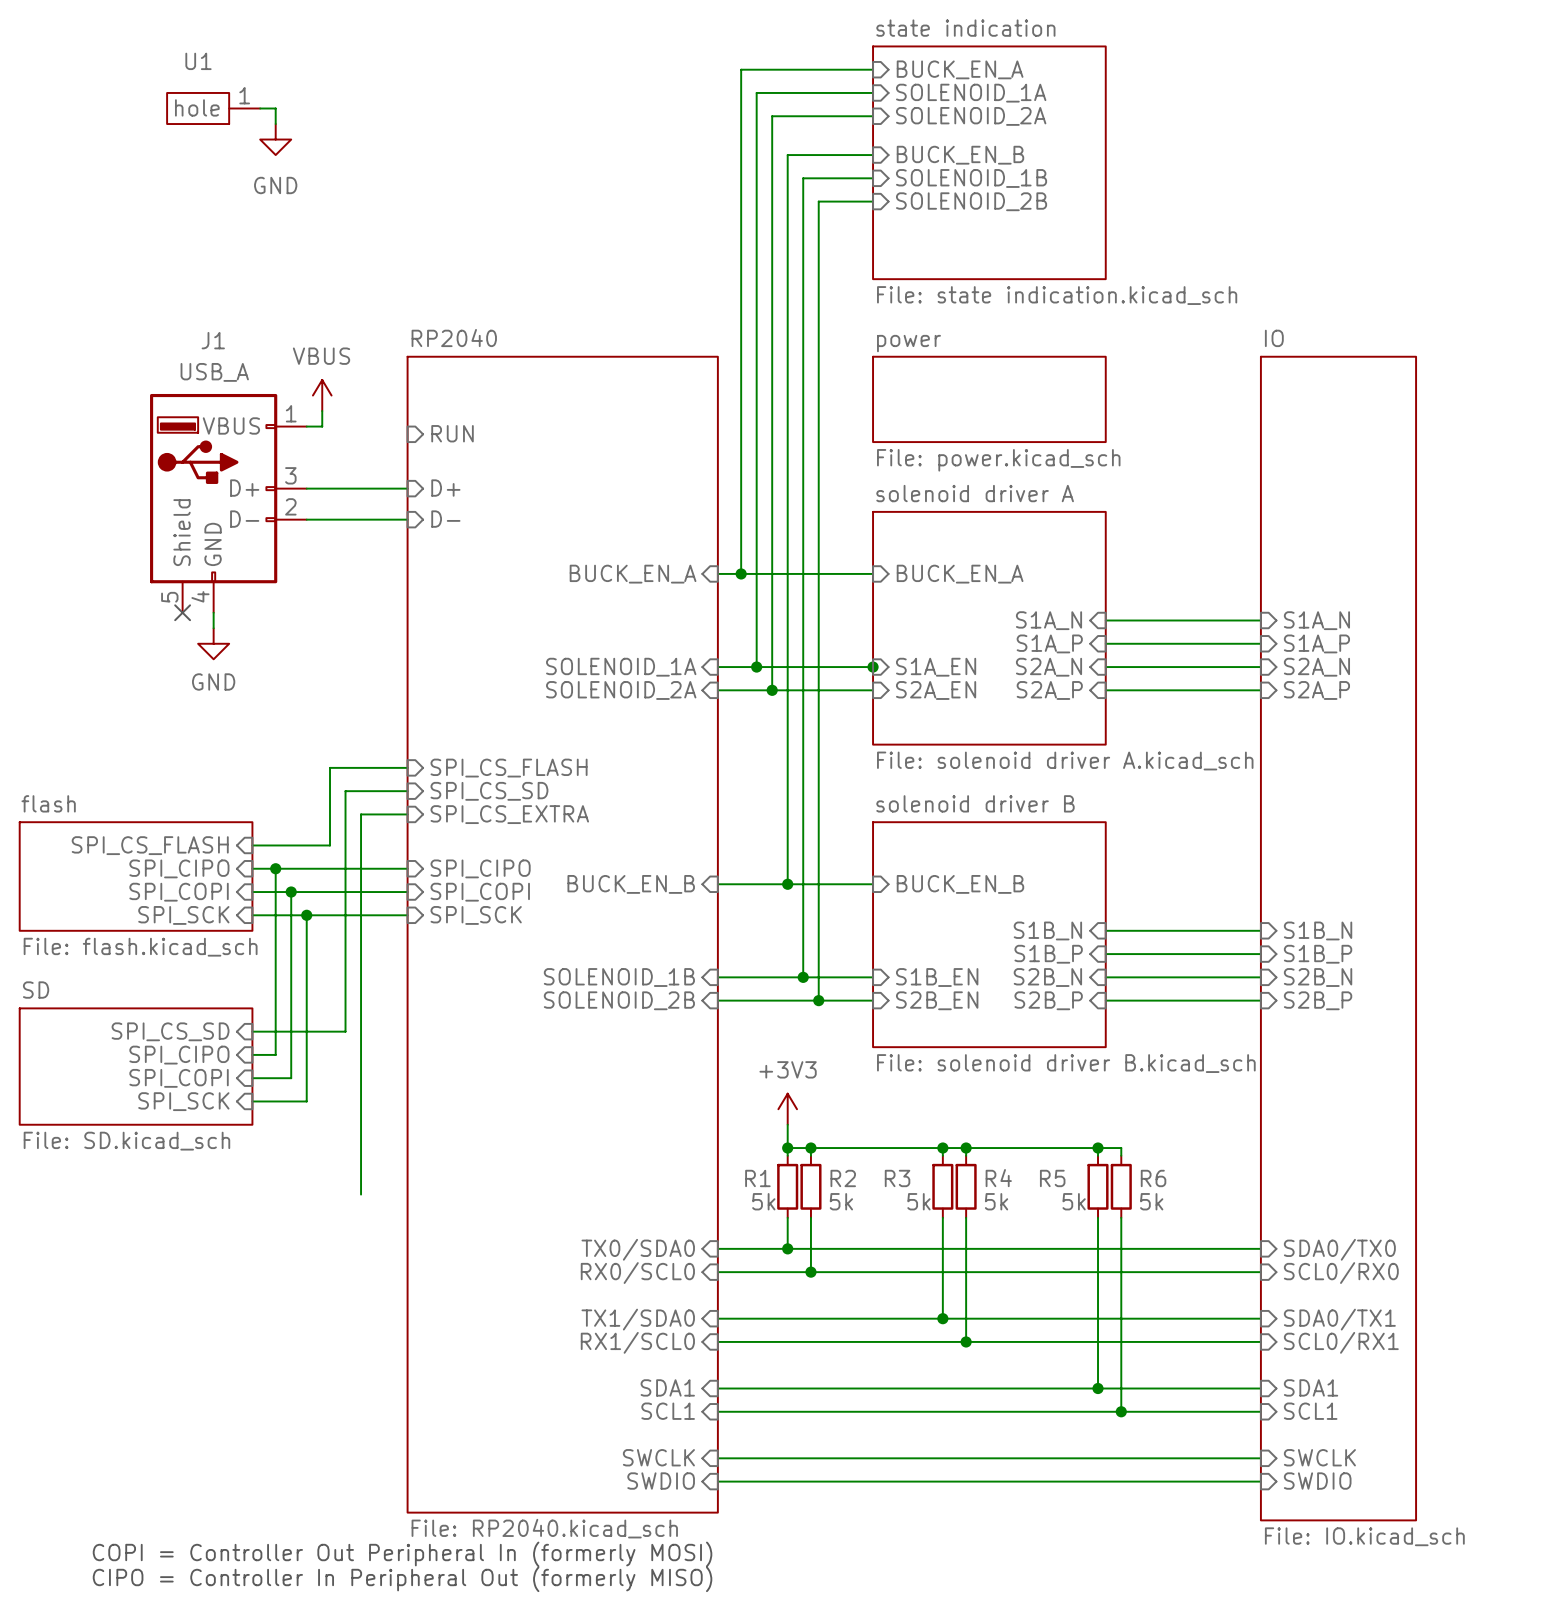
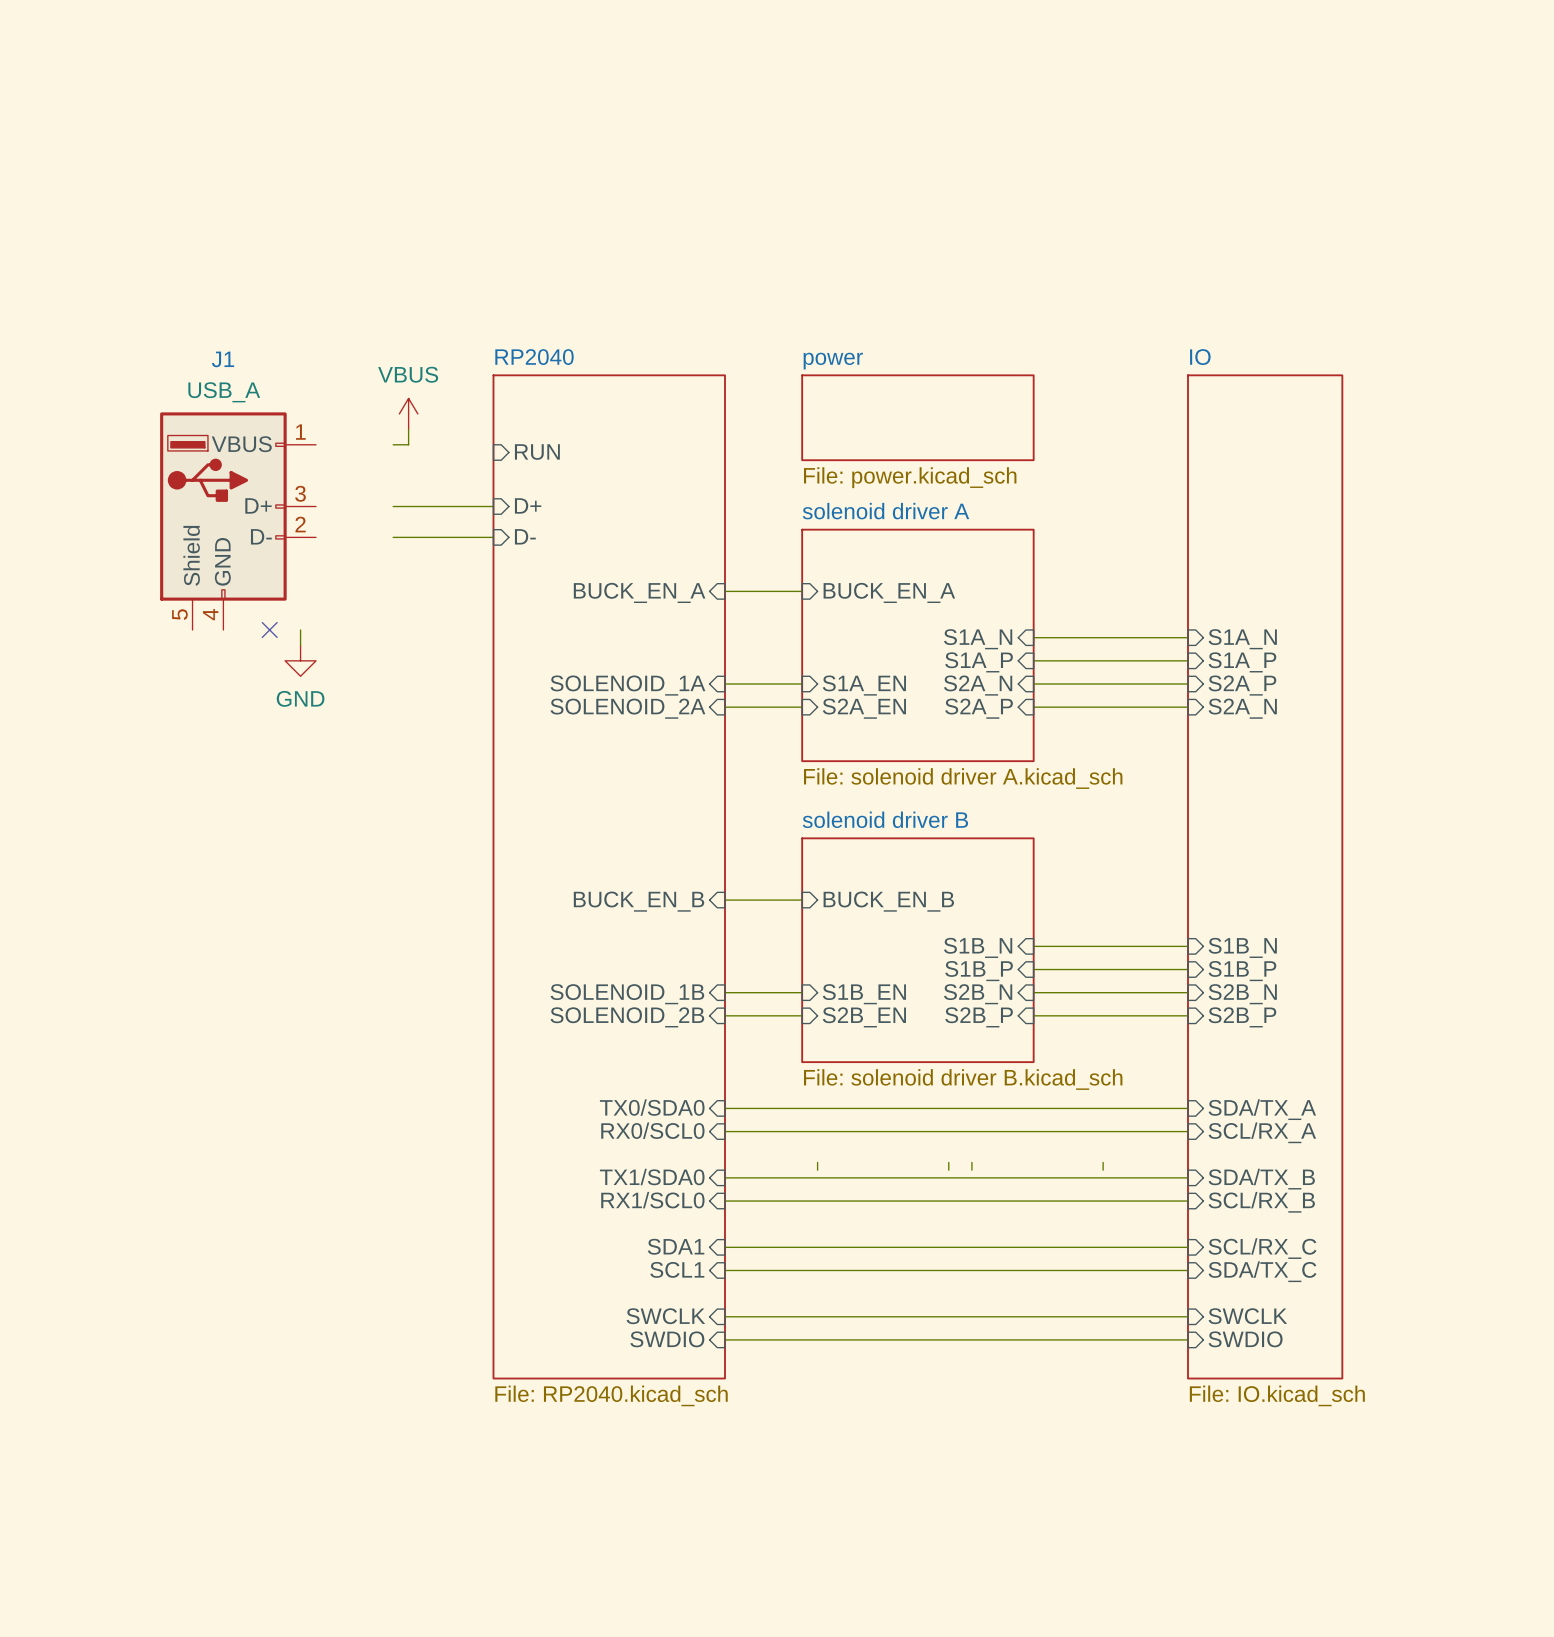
wire: (873, 69) (741, 69) (741, 573) -> none
sheet pin: BUCK_EN_A (960, 69) -> none
wire: (873, 92) (756, 92) (756, 667) -> none
sheet pin: SOLENOID_1A (971, 93) -> none
U1: (213, 108) -> none
wire: (260, 108) (275, 108) (275, 124) -> none
wire: (873, 116) (772, 116) (772, 690) -> none
sheet pin: SOLENOID_2A (971, 116) -> none
power symbol: GND (275, 139) -> none
wire: (873, 155) (787, 155) (787, 884) -> none
sheet pin: BUCK_EN_B (960, 155) -> none
sheet state indication: File: state indication.kicad_sch (989, 162) -> none
wire: (873, 178) (803, 178) (803, 977) -> none
sheet pin: SOLENOID_1B (971, 178) -> none
wire: (873, 201) (818, 201) (818, 1000) -> none
sheet pin: SOLENOID_2B (971, 201) -> none
sheet RP2040 name position: RP2040 (454, 338) -> RP2040 (534, 357)
sheet RP2040 shape: [406, 355, 719, 1514] -> [492, 374, 726, 1380]
power symbol position: VBUS (322, 395) -> VBUS (408, 413)
sheet power position: (989, 399) -> (917, 417)
wire: (322, 411) (322, 426) (306, 426) -> (408, 429) (408, 444) (393, 444)
sheet pin position: RUN (452, 433) -> RUN (537, 452)
wire: (306, 488) (384, 488) -> (416, 506) (493, 506)
sheet pin position: D+ (445, 488) -> D+ (528, 505)
wire: (306, 519) (384, 519) -> (416, 537) (493, 537)
sheet pin position: D- (445, 519) -> D- (525, 536)
junction: (741, 573) -> none
wire: (795, 573) (873, 573) -> none
sheet pin position: BUCK_EN_A (960, 574) -> BUCK_EN_A (889, 592)
no-connect mark: (182, 612) -> none
wire: (213, 612) (213, 628) -> (300, 629) (300, 645)
no-connect mark: none -> (269, 629)
sheet pin: none -> S1A_N (978, 639)
sheet pin: S1A_N (1049, 620) -> none
wire: (1183, 620) (1260, 620) -> (1033, 637) (1110, 637)
sheet pin: none -> S1A_N (1242, 639)
sheet pin: S1A_N (1316, 620) -> none
sheet solenoid driver A position: (989, 628) -> (917, 645)
power symbol position: GND (213, 643) -> GND (300, 660)
sheet pin: none -> S1A_P (979, 662)
sheet pin: S1A_P (1049, 643) -> none
wire: (1183, 643) (1260, 643) -> (1033, 660) (1110, 660)
sheet pin: none -> S1A_P (1242, 662)
sheet pin: S1A_P (1316, 643) -> none
junction: (756, 667) -> none
wire: (795, 667) (874, 667) -> none
junction: (873, 667) -> none
sheet pin position: S1A_EN (936, 667) -> S1A_EN (864, 685)
sheet pin: none -> S2A_N (978, 685)
sheet pin: S2A_N (1049, 667) -> none
wire: (1183, 667) (1260, 667) -> (1033, 684) (1110, 684)
sheet pin: none -> S2A_P (1242, 685)
sheet pin: S2A_N (1316, 667) -> none
junction: (772, 690) -> none
wire: (795, 690) (873, 690) -> none
sheet pin position: S2A_EN (936, 690) -> S2A_EN (864, 708)
sheet pin: none -> S2A_P (979, 708)
sheet pin: S2A_P (1049, 690) -> none
wire: (1183, 690) (1260, 690) -> (1033, 707) (1110, 707)
sheet pin: none -> S2A_N (1242, 708)
sheet pin: S2A_P (1316, 690) -> none
wire: (407, 767) (330, 767) (330, 845) (252, 845) -> none
sheet pin: SPI_CS_FLASH (509, 768) -> none
wire: (407, 791) (345, 791) (345, 1031) (252, 1031) -> none
sheet pin: SPI_CS_SD (489, 791) -> none
wire: (407, 814) (361, 814) (361, 1194) -> none
sheet pin: SPI_CS_EXTRA (509, 814) -> none
sheet pin: SPI_CS_FLASH (150, 845) -> none
sheet IO: none -> File: IO.kicad_sch (1265, 876)
sheet pin: SPI_CIPO (179, 868) -> none
wire: (252, 868) (407, 868) -> none
wire: (275, 868) (275, 1054) (252, 1054) -> none
junction: (275, 868) -> none
sheet pin: SPI_CIPO (480, 868) -> none
sheet flash: File: flash.kicad_sch (136, 876) -> none
junction: (787, 884) -> none
wire: (795, 884) (873, 884) -> none
sheet pin position: BUCK_EN_B (960, 884) -> BUCK_EN_B (888, 901)
sheet pin: SPI_COPI (179, 892) -> none
wire: (252, 892) (407, 892) -> none
wire: (291, 892) (291, 1078) (252, 1078) -> none
junction: (291, 892) -> none
sheet pin: SPI_COPI (480, 892) -> none
sheet pin: SPI_SCK (183, 915) -> none
wire: (252, 915) (407, 915) -> none
wire: (306, 915) (306, 1101) (252, 1101) -> none
junction: (306, 915) -> none
sheet pin: SPI_SCK (476, 915) -> none
sheet pin: none -> S1B_N (978, 947)
sheet pin: S1B_N (1047, 930) -> none
wire: (1183, 930) (1260, 930) -> (1033, 946) (1110, 946)
sheet pin: none -> S1B_N (1242, 947)
sheet pin: S1B_N (1318, 930) -> none
sheet solenoid driver B position: (989, 934) -> (917, 950)
sheet IO: File: IO.kicad_sch (1338, 938) -> none
sheet pin: none -> S1B_P (979, 971)
sheet pin: S1B_P (1048, 954) -> none
wire: (1183, 954) (1260, 954) -> (1033, 969) (1110, 969)
sheet pin: none -> S1B_P (1242, 971)
sheet pin: S1B_P (1318, 954) -> none
wire: (795, 977) (873, 977) -> none
junction: (803, 977) -> none
sheet pin position: S1B_EN (937, 977) -> S1B_EN (864, 994)
sheet pin: none -> S2B_N (978, 994)
sheet pin: S2B_N (1047, 977) -> none
wire: (1183, 977) (1260, 977) -> (1033, 992) (1110, 992)
sheet pin: none -> S2B_N (1242, 994)
sheet pin: S2B_N (1318, 977) -> none
wire: (795, 1000) (873, 1000) -> none
junction: (818, 1000) -> none
sheet pin position: S2B_EN (937, 1000) -> S2B_EN (864, 1017)
sheet pin: none -> S2B_P (979, 1017)
sheet pin: S2B_P (1048, 1000) -> none
wire: (1183, 1000) (1260, 1000) -> (1033, 1015) (1110, 1015)
sheet pin: none -> S2B_P (1242, 1017)
sheet pin: S2B_P (1318, 1000) -> none
sheet pin: SPI_CS_SD (170, 1031) -> none
sheet pin: SPI_CIPO (179, 1055) -> none
sheet SD: File: SD.kicad_sch (136, 1066) -> none
sheet pin: SPI_COPI (179, 1078) -> none
wire: none -> (724, 1108) (1188, 1108)
sheet pin: none -> SDA/TX_A (1262, 1109)
sheet pin: SPI_SCK (183, 1101) -> none
power symbol: +3V3 (787, 1109) -> none
wire: none -> (724, 1131) (1188, 1131)
sheet pin: none -> SCL/RX_A (1262, 1132)
wire: (787, 1124) (787, 1155) -> none
wire: (787, 1148) (1121, 1148) (1121, 1155) -> none
junction: (787, 1148) -> none
junction: (810, 1148) -> none
junction: (942, 1148) -> none
junction: (966, 1148) -> none
junction: (1098, 1148) -> none
wire: none -> (724, 1177) (1188, 1177)
sheet pin: none -> SDA/TX_B (1261, 1179)
wire: none -> (724, 1201) (1188, 1201)
R1: 5k (787, 1186) -> none
R2: 5k (810, 1186) -> none
R3: 5k (942, 1186) -> none
R4: 5k (966, 1186) -> none
R5: 5k (1098, 1186) -> none
R6: 5k (1121, 1186) -> none
sheet pin: none -> SCL/RX_B (1261, 1202)
wire: (787, 1217) (787, 1248) -> none
wire: (810, 1217) (810, 1272) -> none
wire: (942, 1217) (942, 1318) -> none
wire: (966, 1217) (966, 1341) -> none
wire: (1098, 1217) (1098, 1388) -> none
wire: (1121, 1217) (1121, 1411) -> none
wire: none -> (724, 1247) (1188, 1247)
sheet pin: none -> SCL/RX_C (1262, 1248)
wire: (717, 1248) (1260, 1248) -> none
junction: (787, 1248) -> none
sheet pin position: TX0/SDA0 (638, 1249) -> TX0/SDA0 (652, 1107)
sheet pin: SDA0/TX0 (1339, 1249) -> SDA/TX_C (1262, 1271)
wire: none -> (724, 1270) (1188, 1270)
wire: (717, 1272) (1260, 1272) -> none
junction: (810, 1272) -> none
sheet pin position: RX0/SCL0 (637, 1273) -> RX0/SCL0 (652, 1130)
sheet pin: SCL0/RX0 (1341, 1273) -> none
wire: none -> (724, 1316) (1188, 1316)
wire: (717, 1318) (1260, 1318) -> none
junction: (942, 1318) -> none
sheet pin position: TX1/SDA0 (638, 1319) -> TX1/SDA0 (652, 1177)
sheet pin: SDA0/TX1 (1339, 1319) -> none
wire: none -> (724, 1339) (1188, 1339)
wire: (717, 1341) (1260, 1341) -> none
junction: (966, 1341) -> none
sheet pin position: RX1/SCL0 (637, 1342) -> RX1/SCL0 (652, 1200)
sheet pin: SCL0/RX1 (1341, 1342) -> none
sheet pin position: SDA1 (667, 1387) -> SDA1 (676, 1246)
sheet pin: SDA1 (1311, 1387) -> none
wire: (717, 1388) (1260, 1388) -> none
junction: (1098, 1388) -> none
sheet pin position: SCL1 (668, 1411) -> SCL1 (677, 1269)
wire: (717, 1411) (1260, 1411) -> none
junction: (1121, 1411) -> none
sheet pin: SCL1 (1310, 1411) -> none
sheet pin position: SWCLK (658, 1457) -> SWCLK (665, 1316)
sheet pin position: SWCLK (1319, 1457) -> SWCLK (1247, 1316)
wire: (717, 1458) (1260, 1458) -> none
sheet pin position: SWDIO (661, 1481) -> SWDIO (667, 1339)
wire: (717, 1481) (1260, 1481) -> none
sheet pin position: SWDIO (1317, 1481) -> SWDIO (1245, 1339)
sheet RP2040 value position: File: RP2040.kicad_sch (544, 1528) -> File: RP2040.kicad_sch (611, 1395)
text: COPI = Controller Out Peripheral In (formerly MOSI) (402, 1554) -> none
text: CIPO = Controller In Peripheral Out (formerly MISO) (402, 1579) -> none

